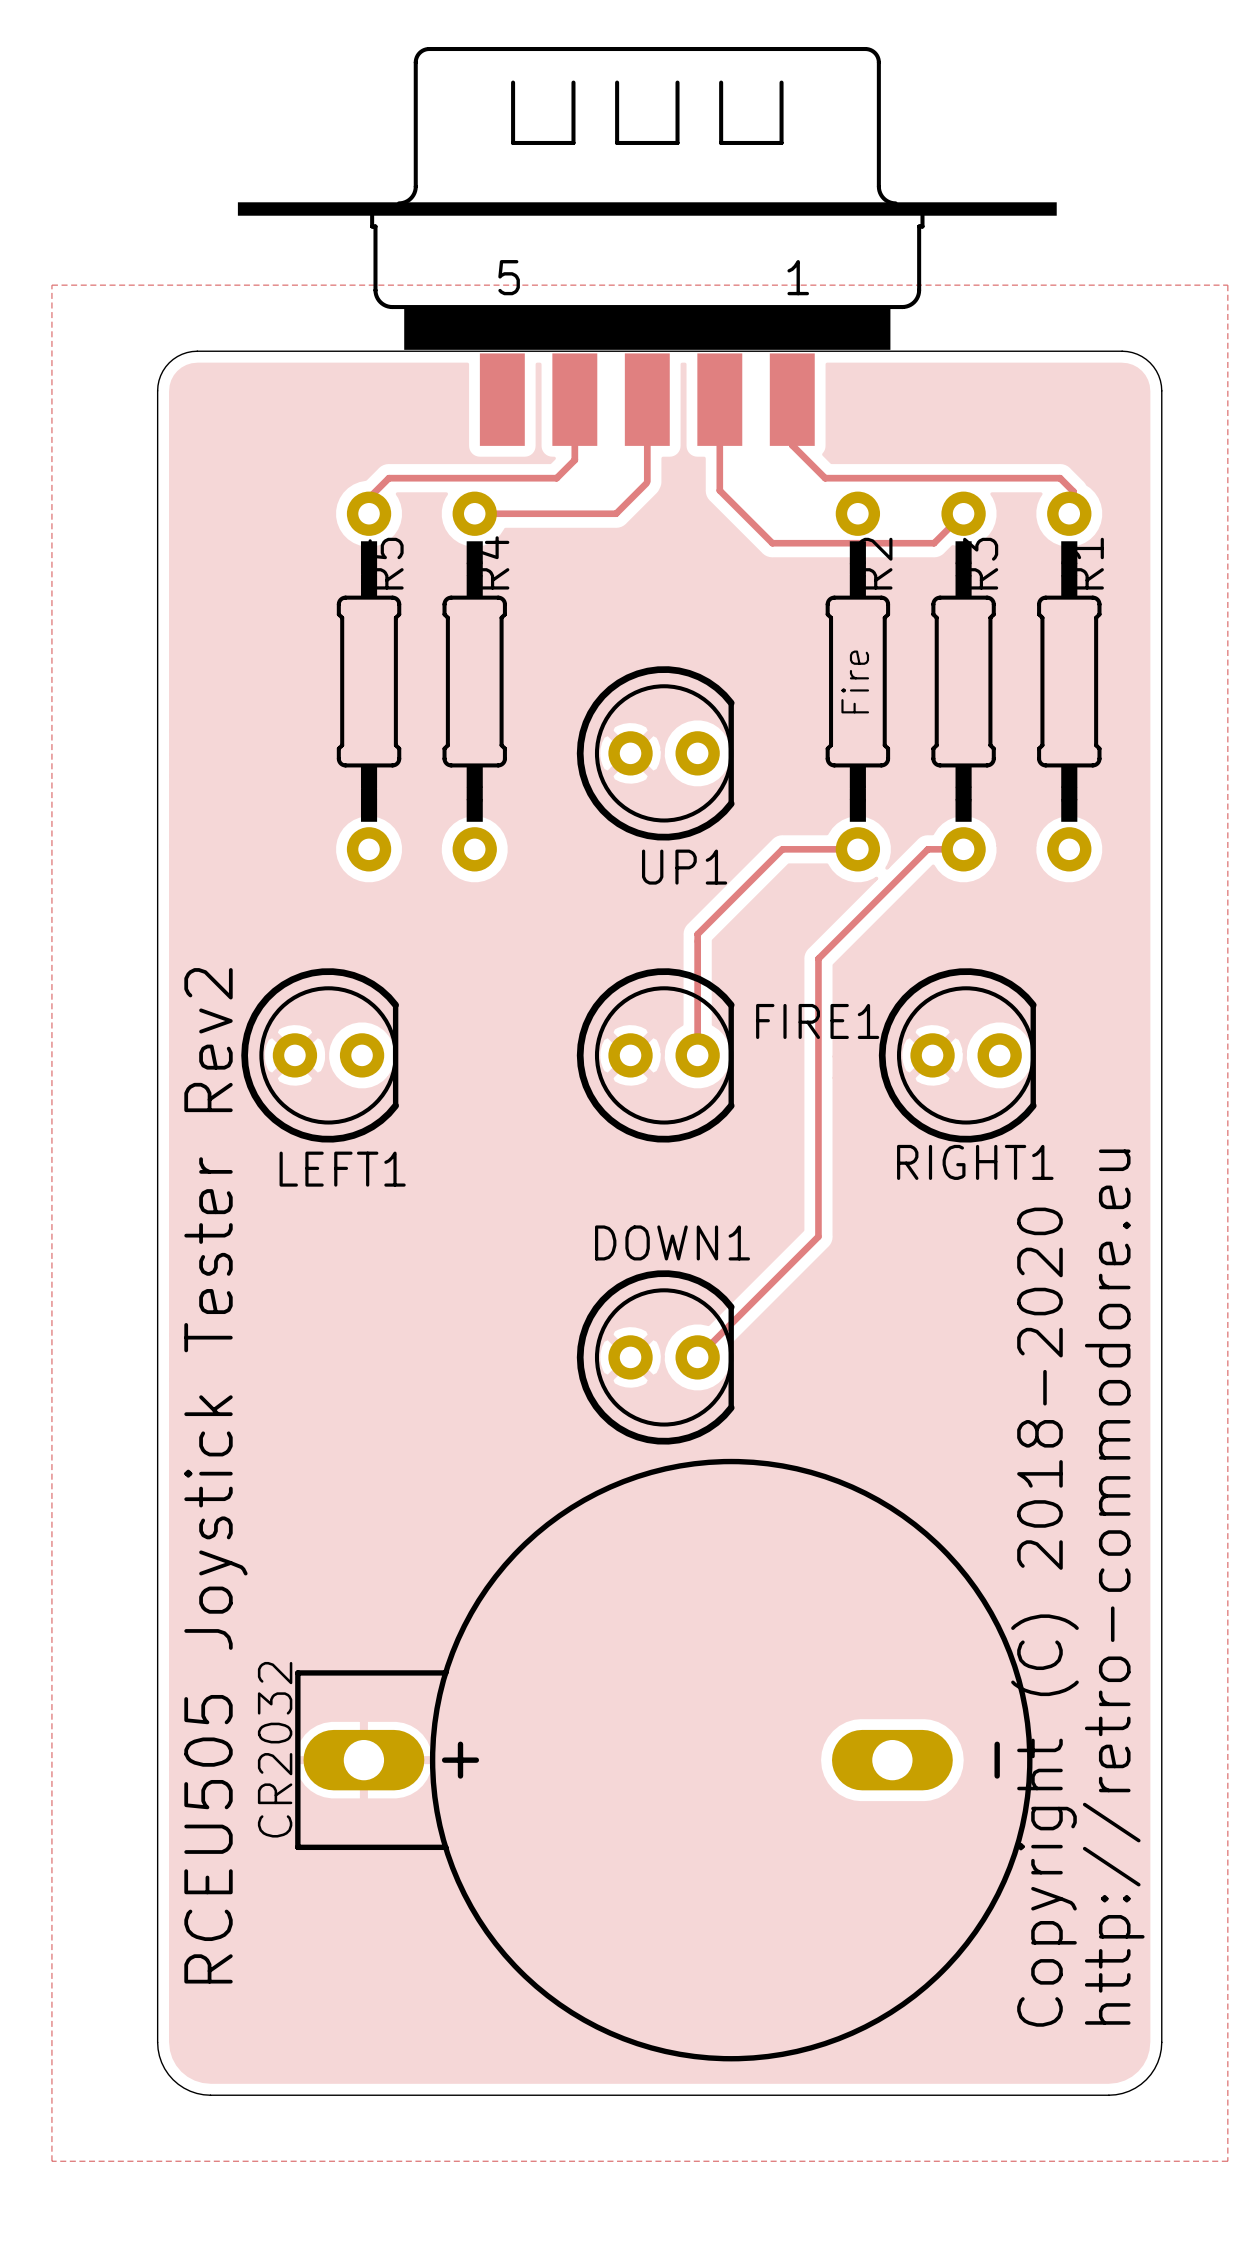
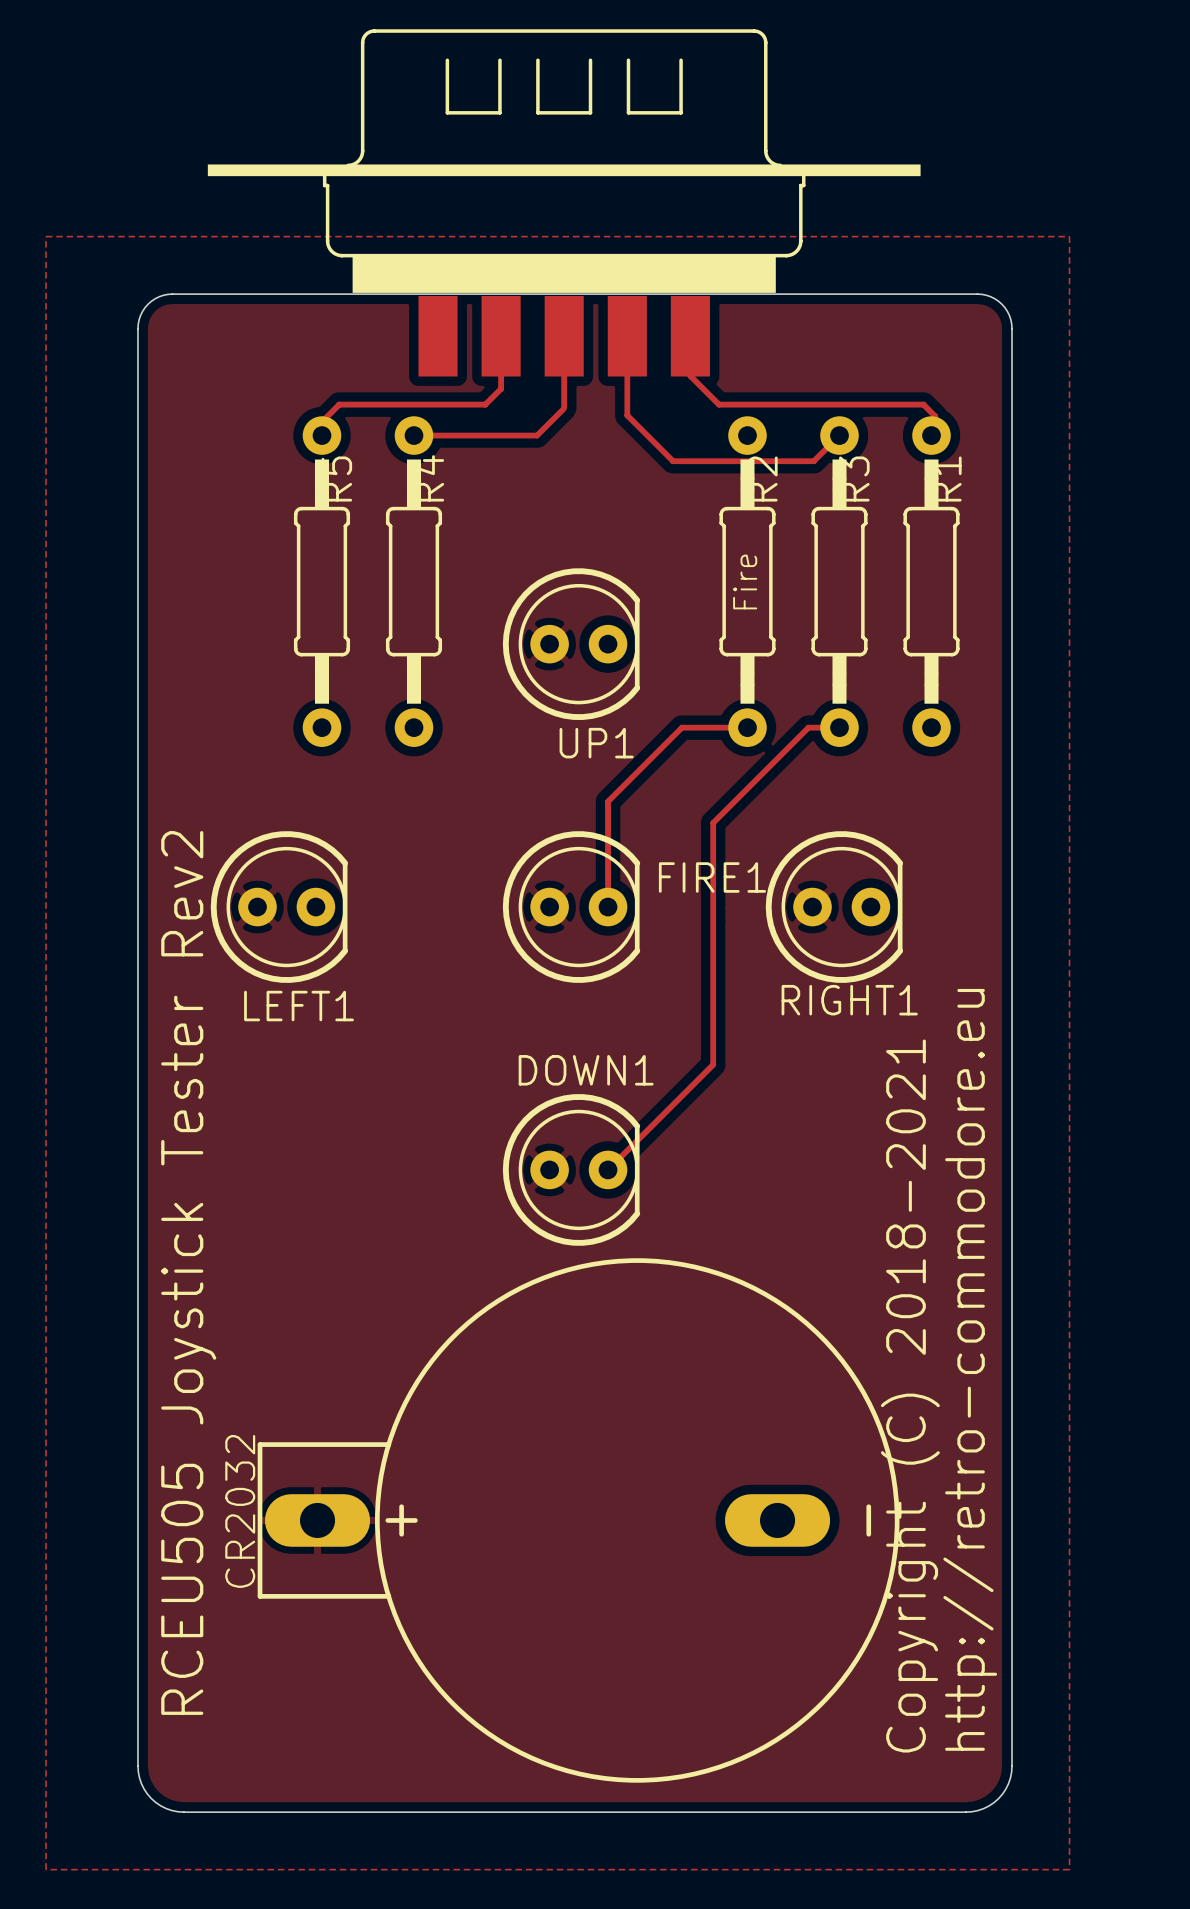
part text: 5 (509, 277) -> none
part text: 1 (798, 277) -> none
text: Copyright (C) 2018-2020 (1044, 1617) -> Copyright (C) 2018-2021 (910, 1396)

